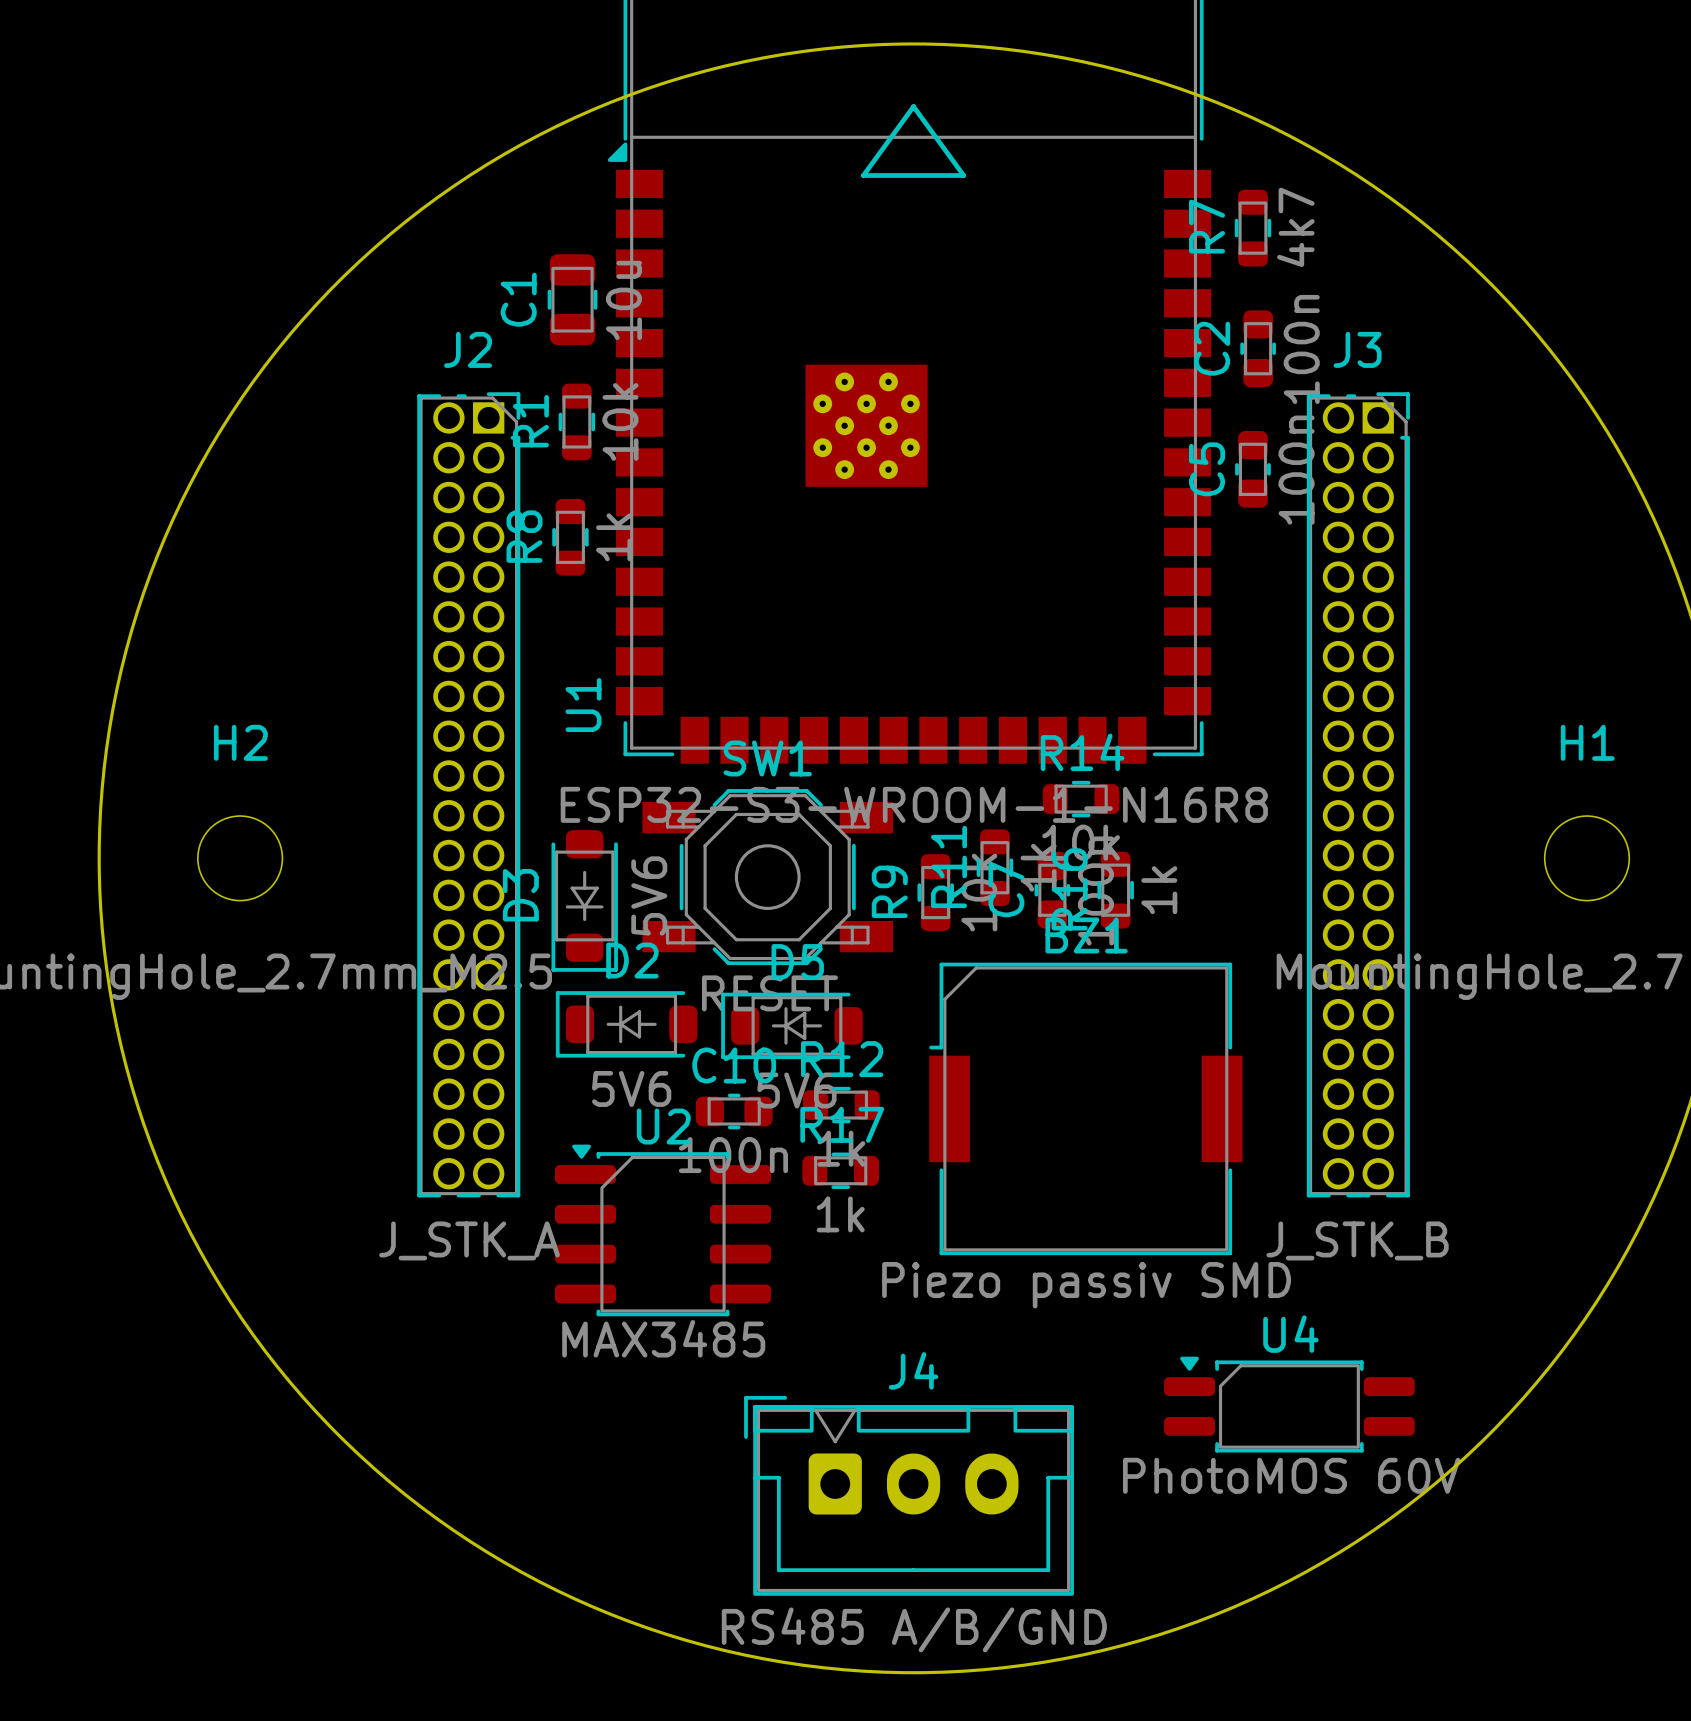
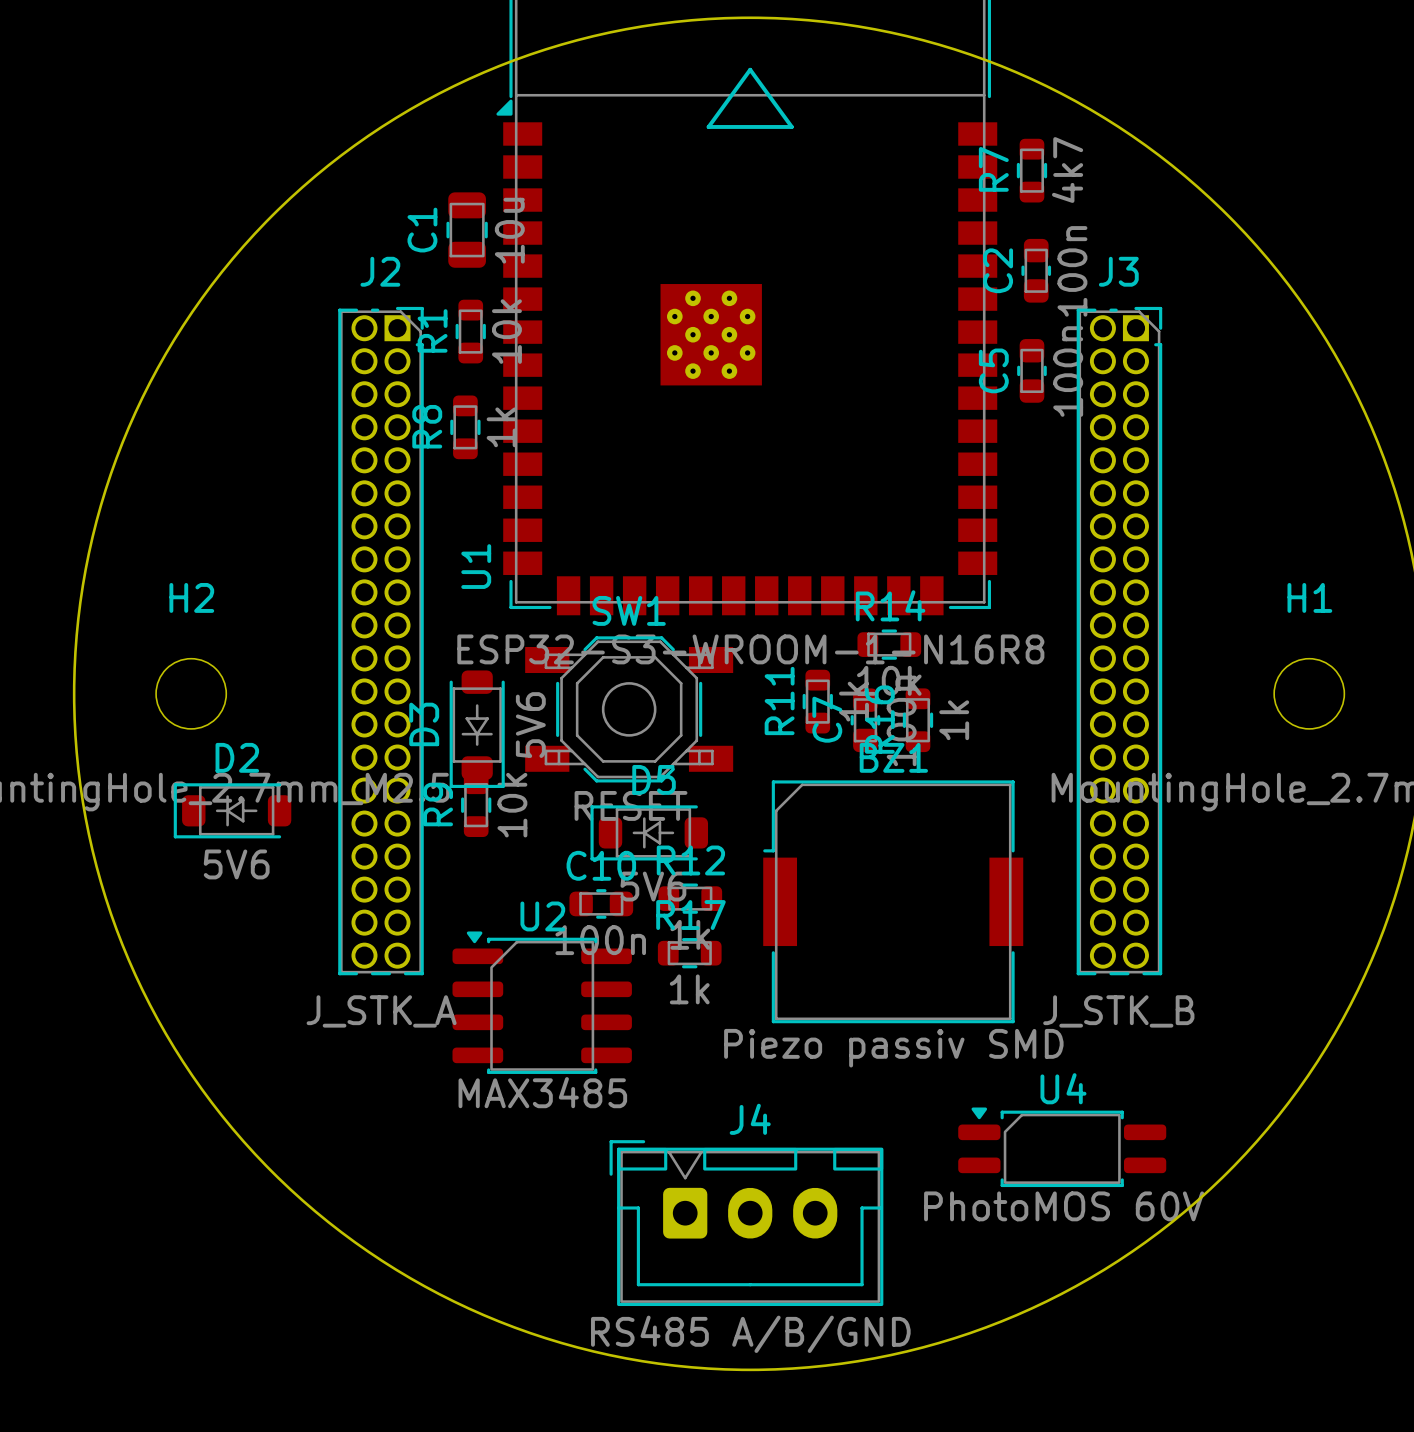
R9 position: (935, 892) -> (476, 805)
D2 position: (626, 1024) -> (232, 810)

